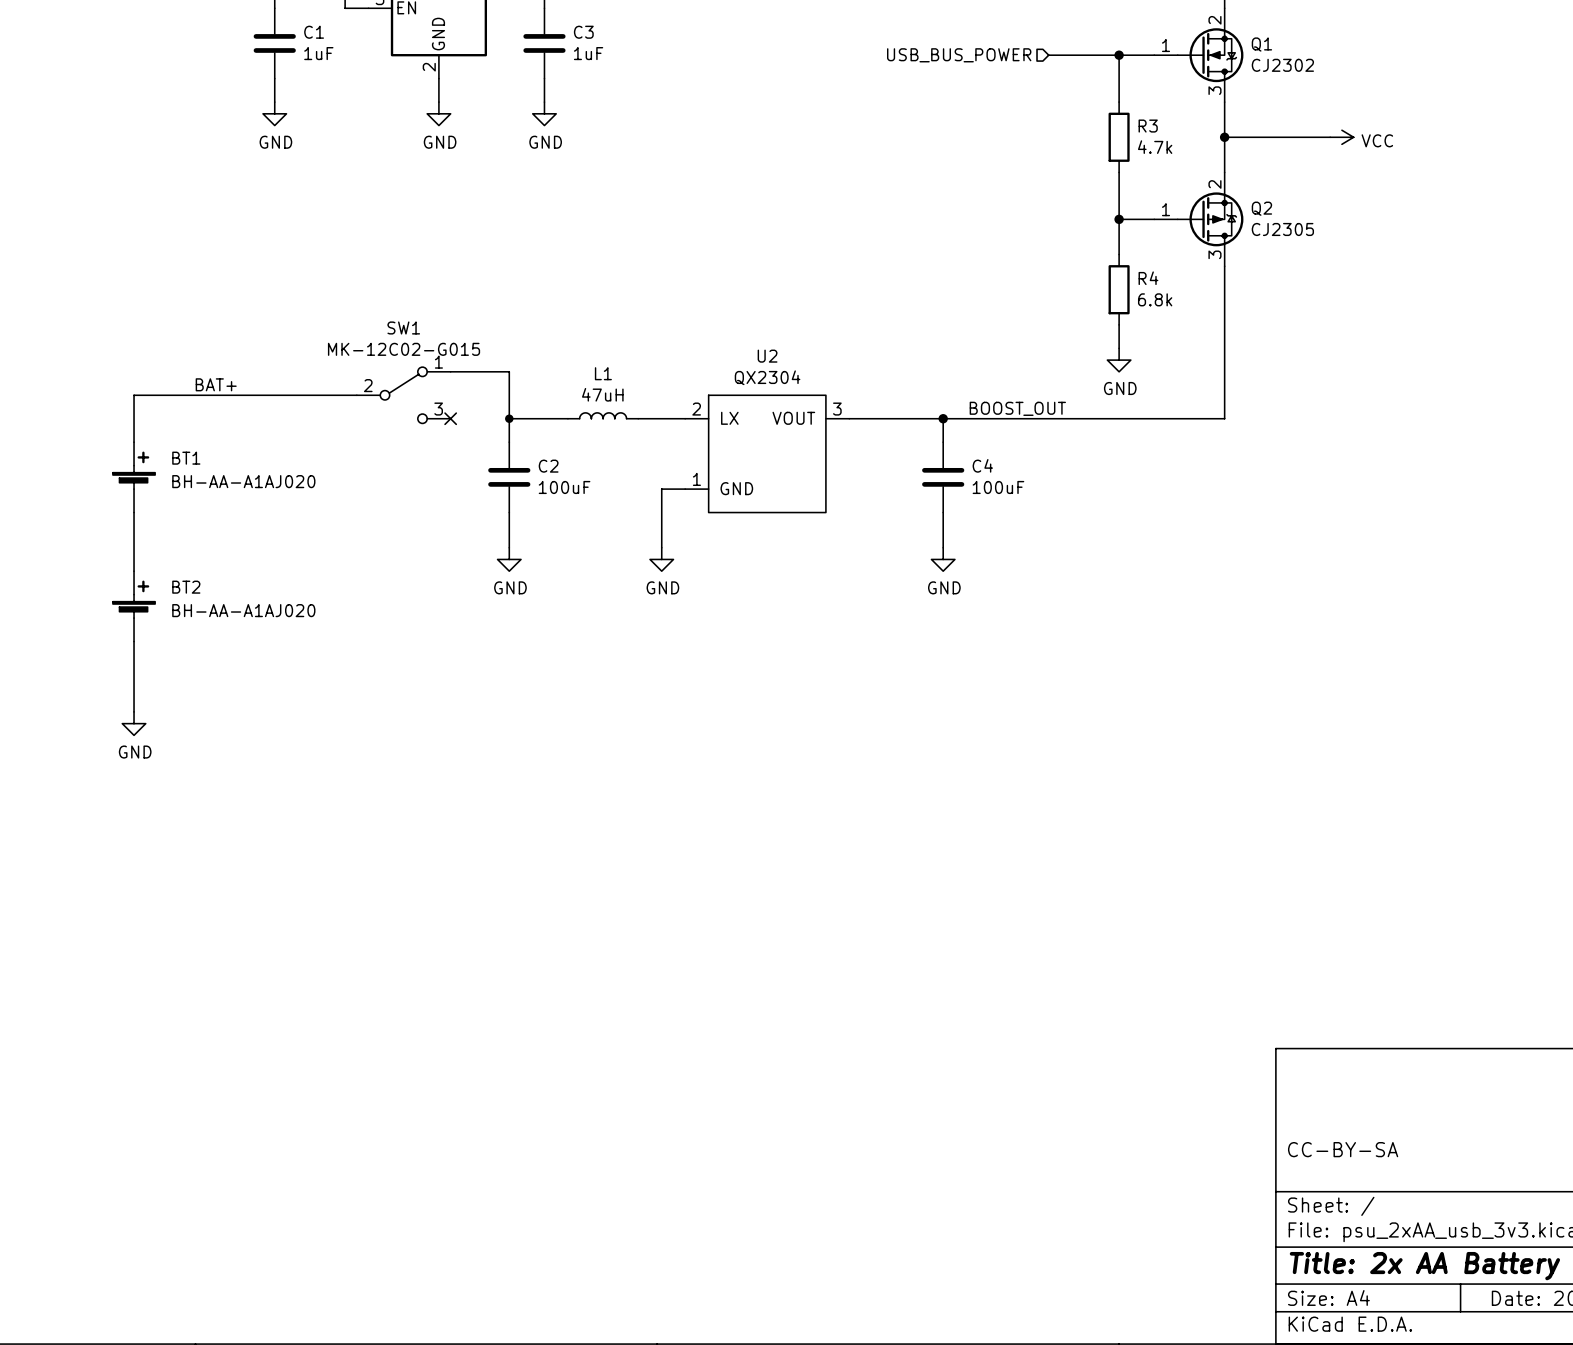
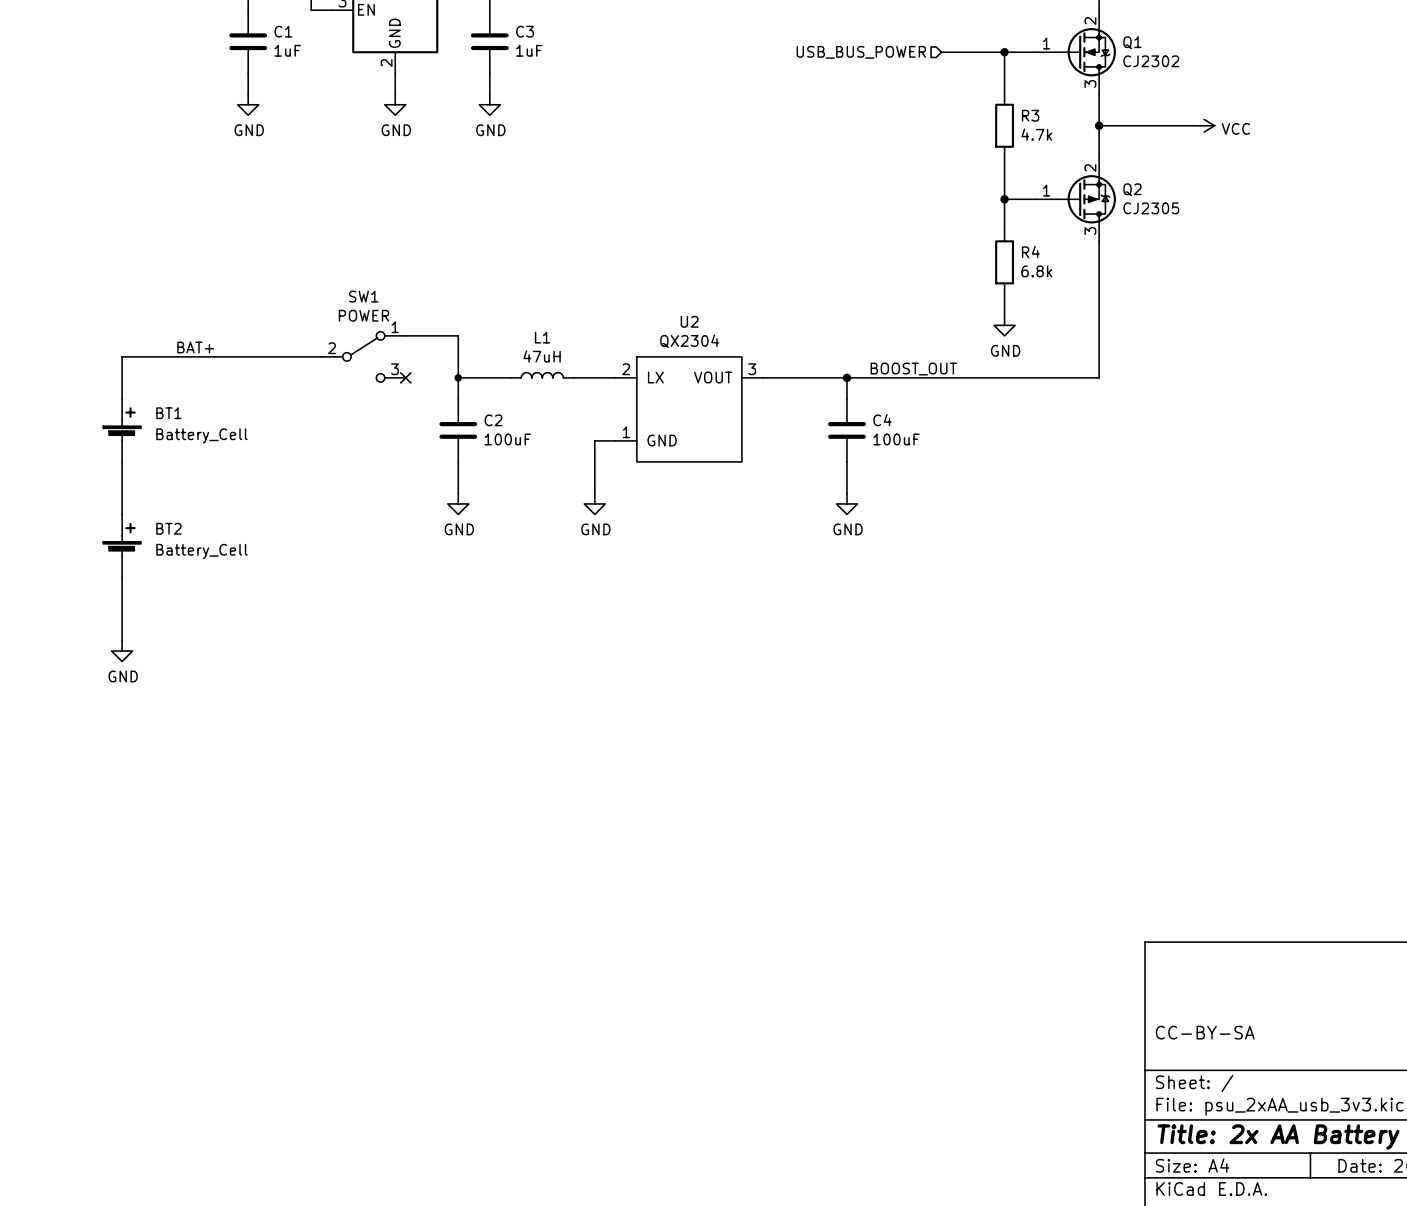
SW1 value: MK-12C02-G015 (404, 349) -> POWER (363, 315)
BT1 value: BH-AA-A1AJ020 (243, 481) -> Battery_Cell (201, 435)
BT2 value: BH-AA-A1AJ020 (243, 610) -> Battery_Cell (201, 551)

